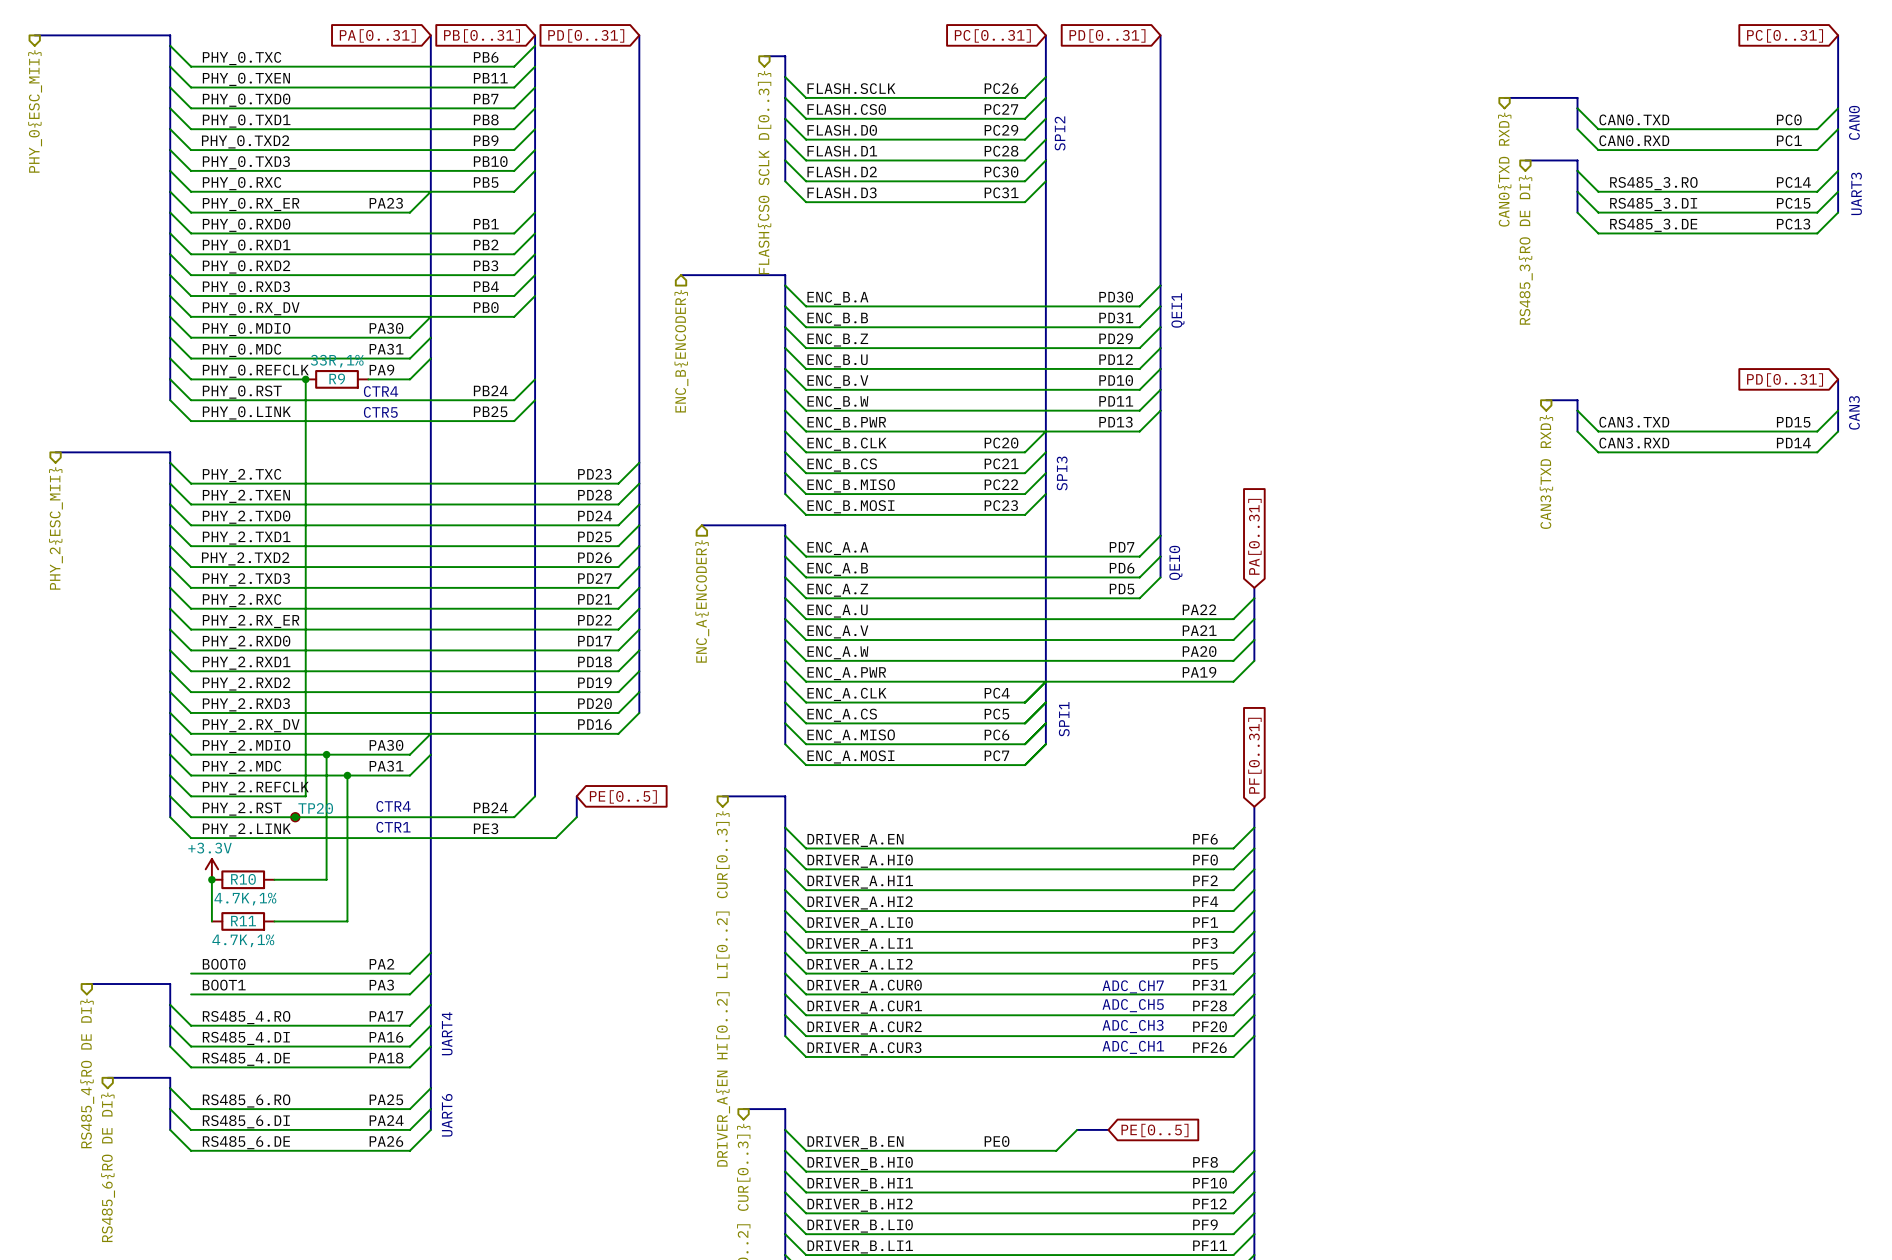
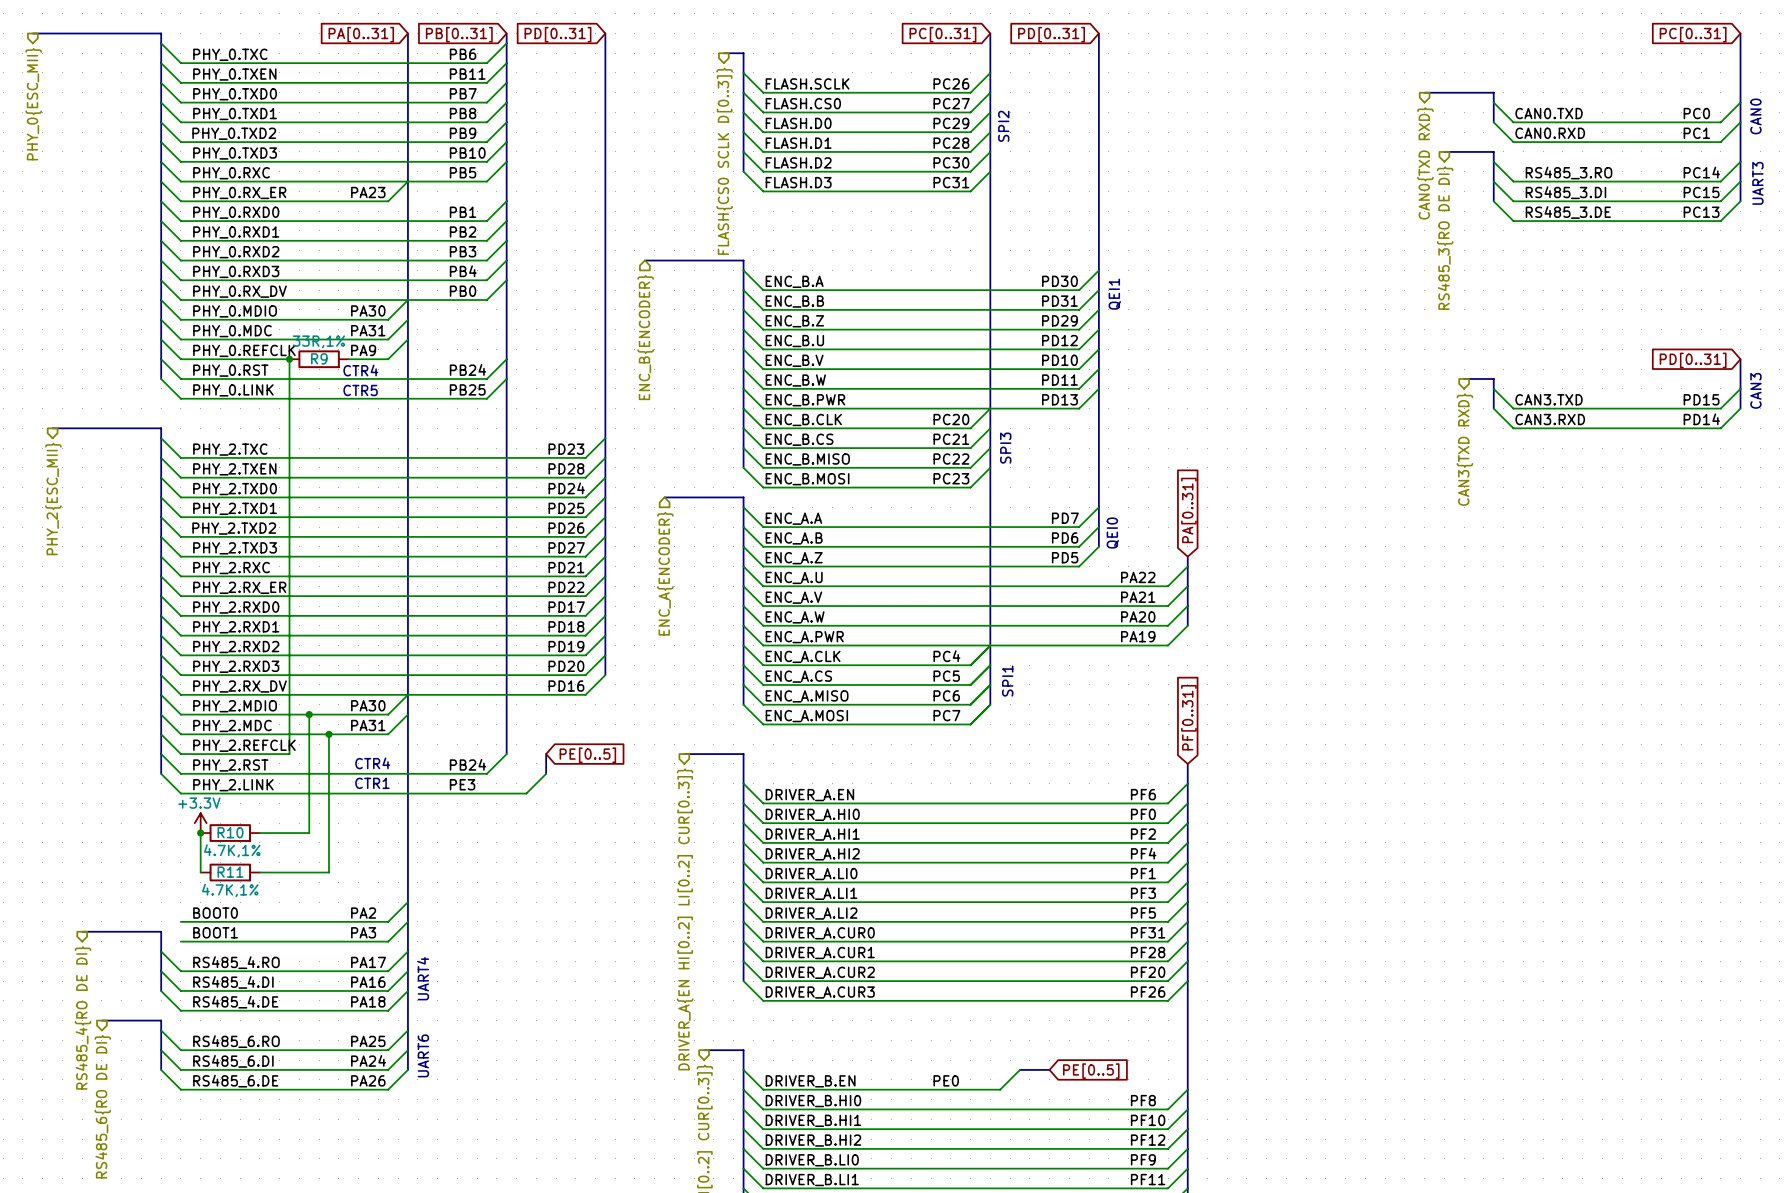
junction: (295, 817) -> none
TP20: (295, 817) -> none
text: ADC_CH7 (1133, 986) -> none
text: ADC_CH5 (1133, 1005) -> none
text: ADC_CH3 (1133, 1026) -> none
text: ADC_CH1 (1133, 1047) -> none

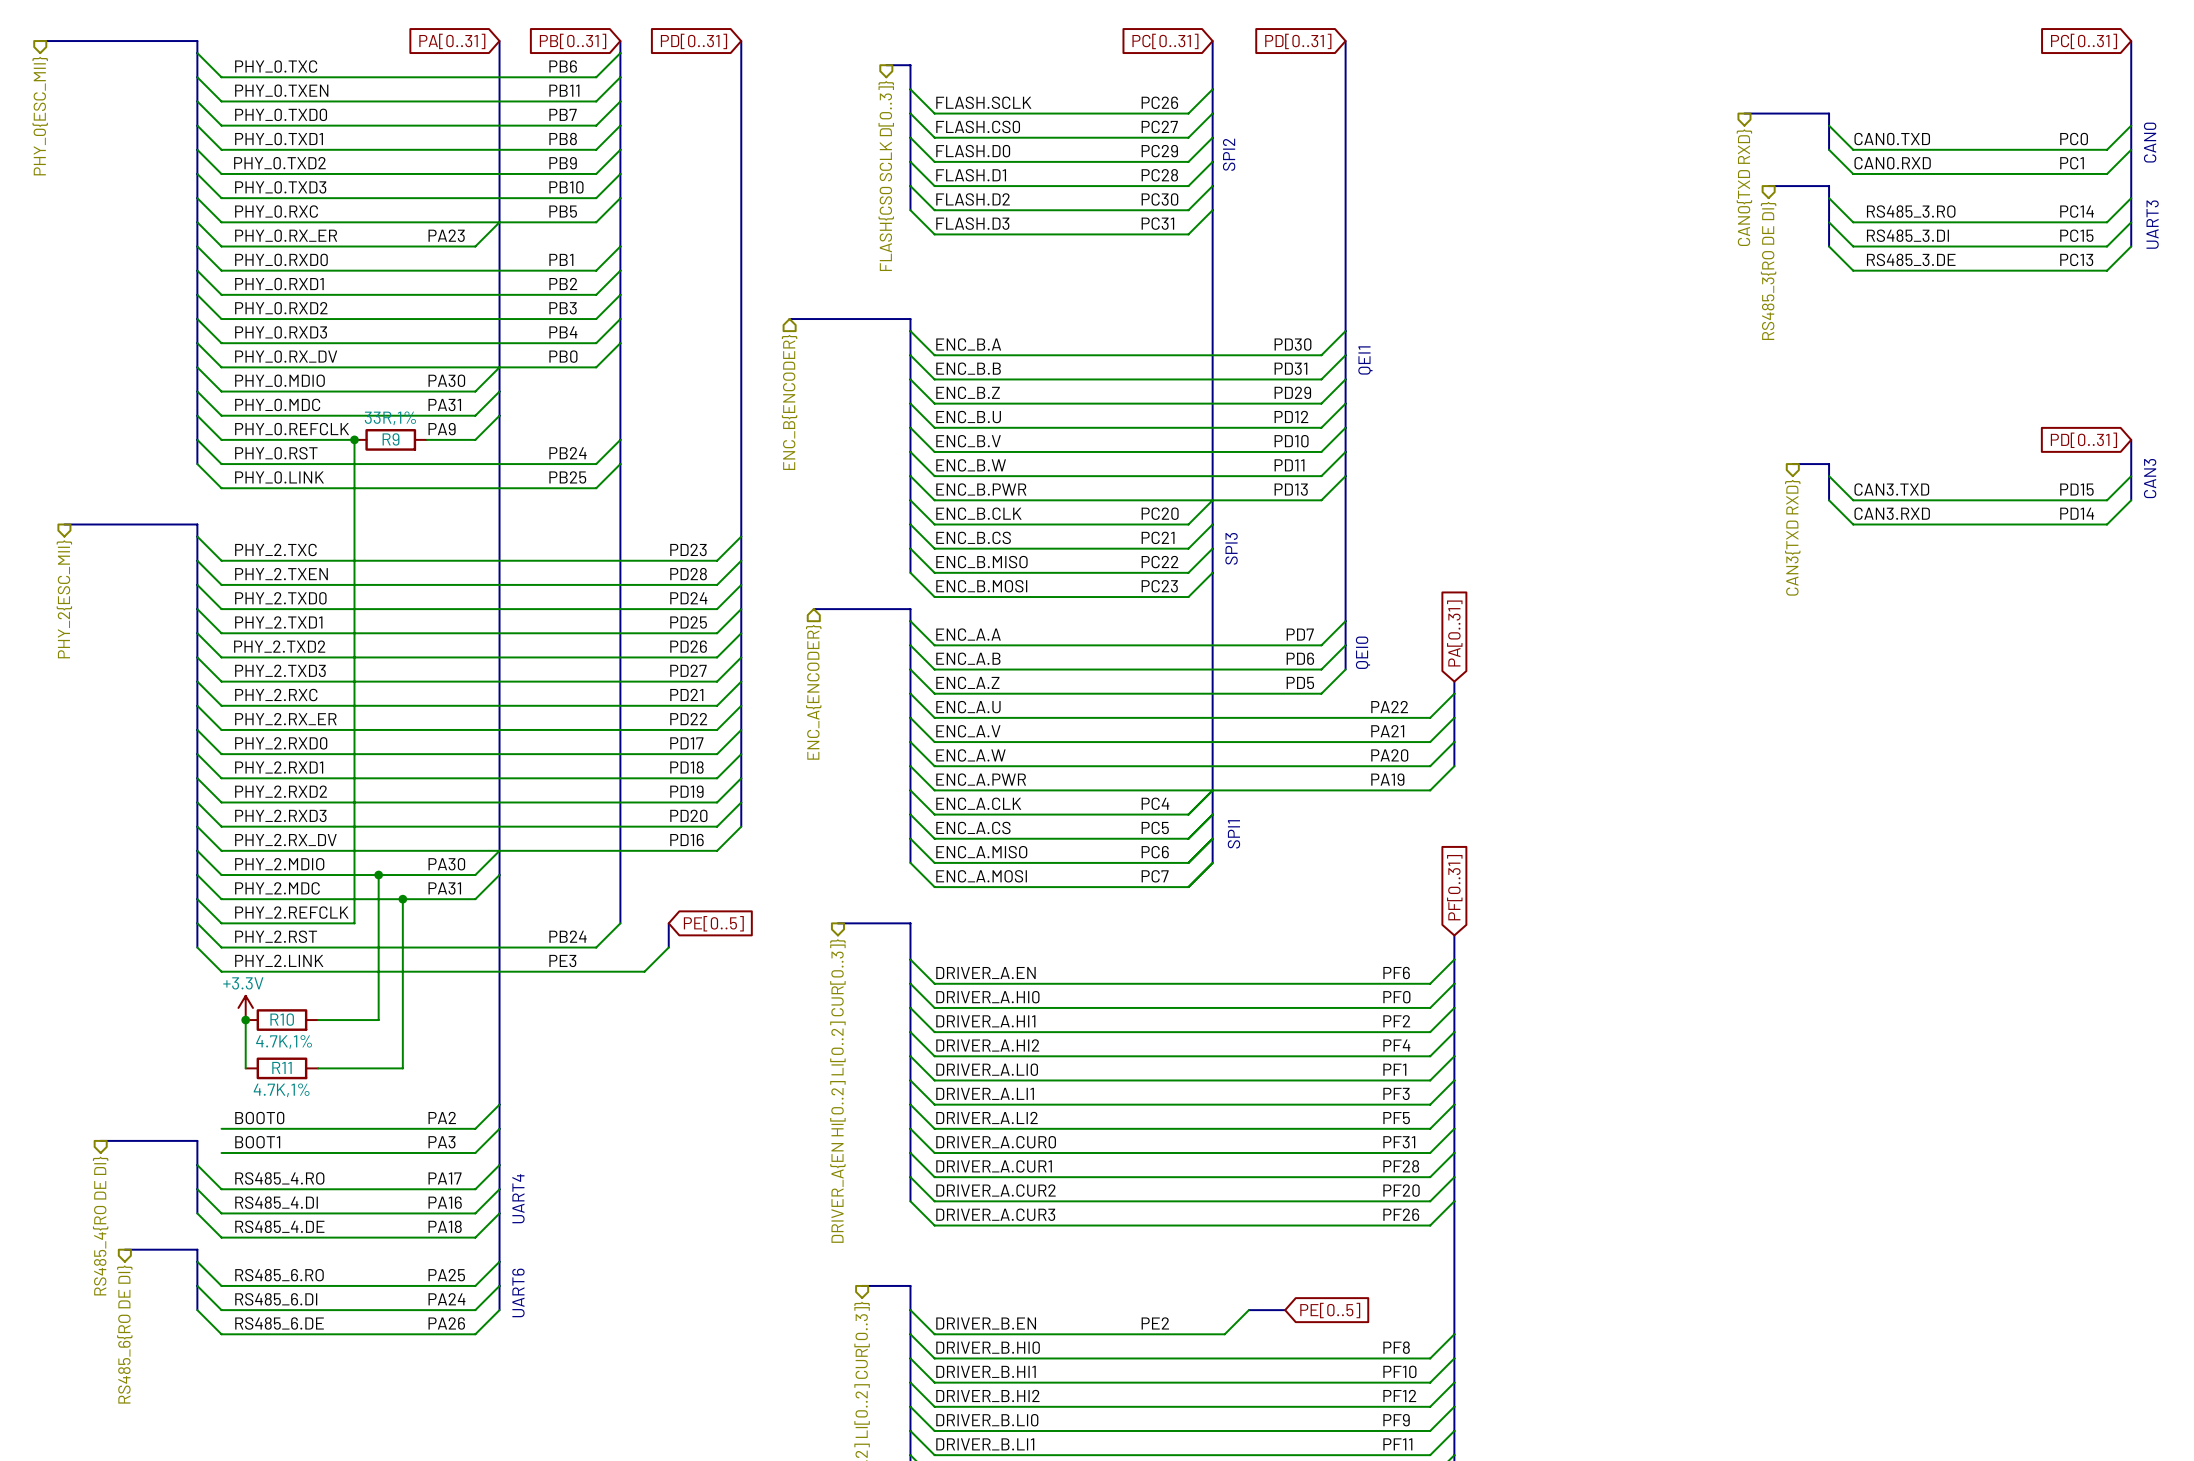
text: CTR4 (360, 370) -> none
text: CTR5 (360, 390) -> none
text: CTR4 (372, 763) -> none
text: CTR1 (372, 783) -> none
label: PE0 (946, 1080) -> PE2 (1155, 1323)

